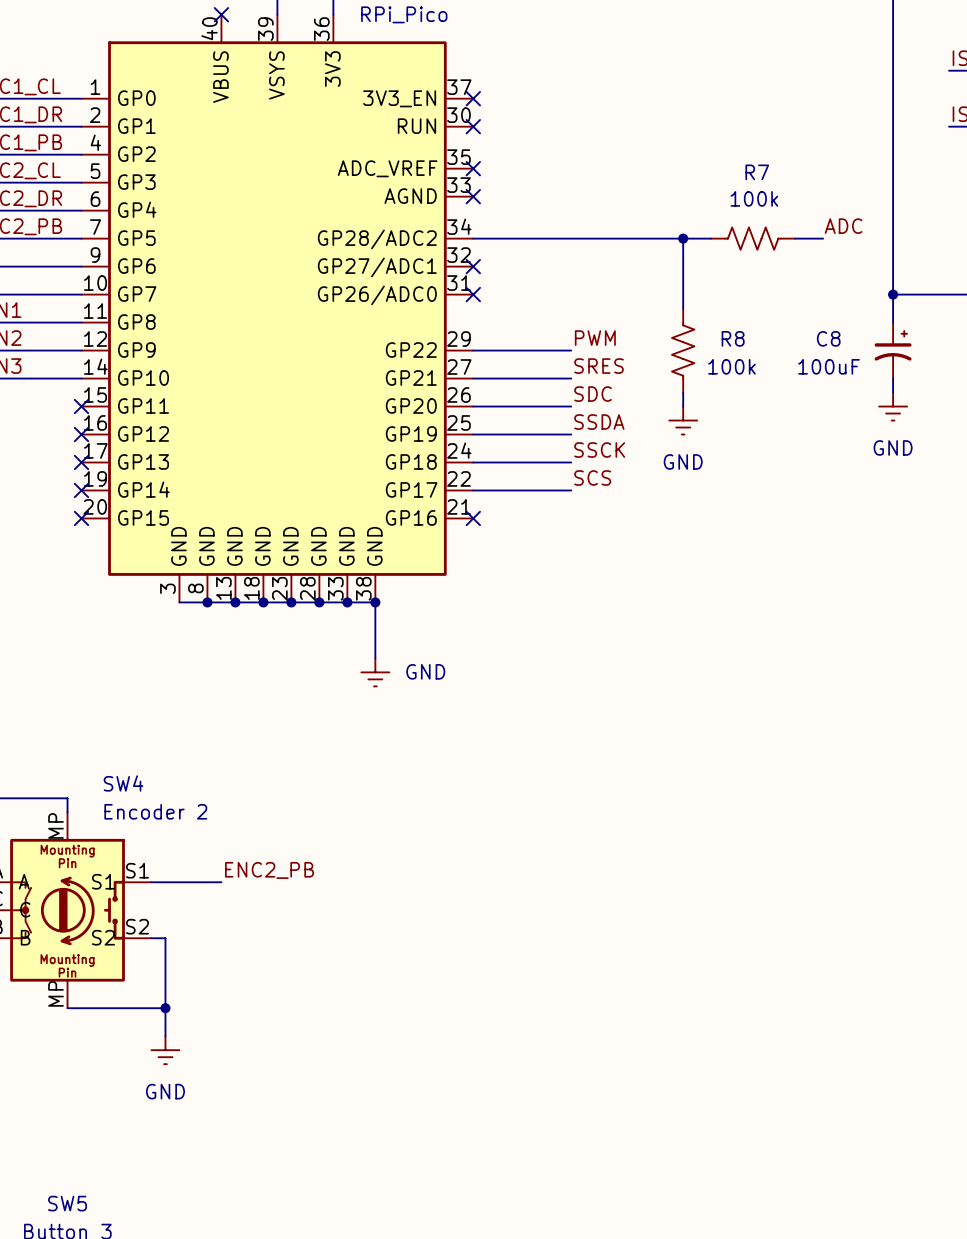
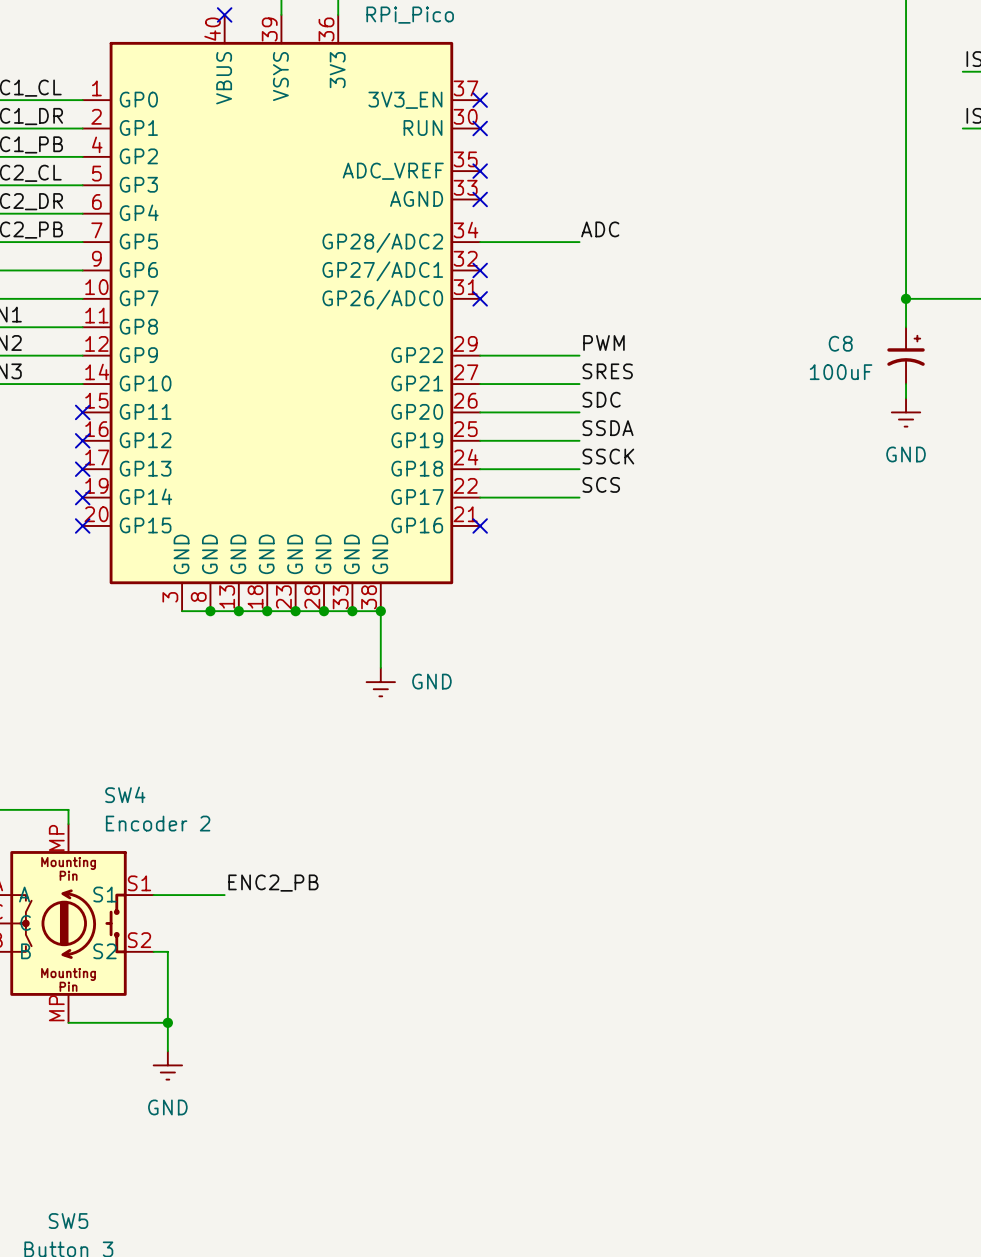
label position: ADC (843, 226) -> ADC (600, 229)
wire: (571, 238) (711, 238) -> none
wire: (683, 238) (683, 308) -> none
junction: (683, 238) -> none
R7: 100k (753, 238) -> none
wire: (795, 238) (823, 238) -> none
R8: 100k (683, 350) -> none
wire: (683, 392) (683, 406) -> none
power symbol: GND (683, 420) -> none

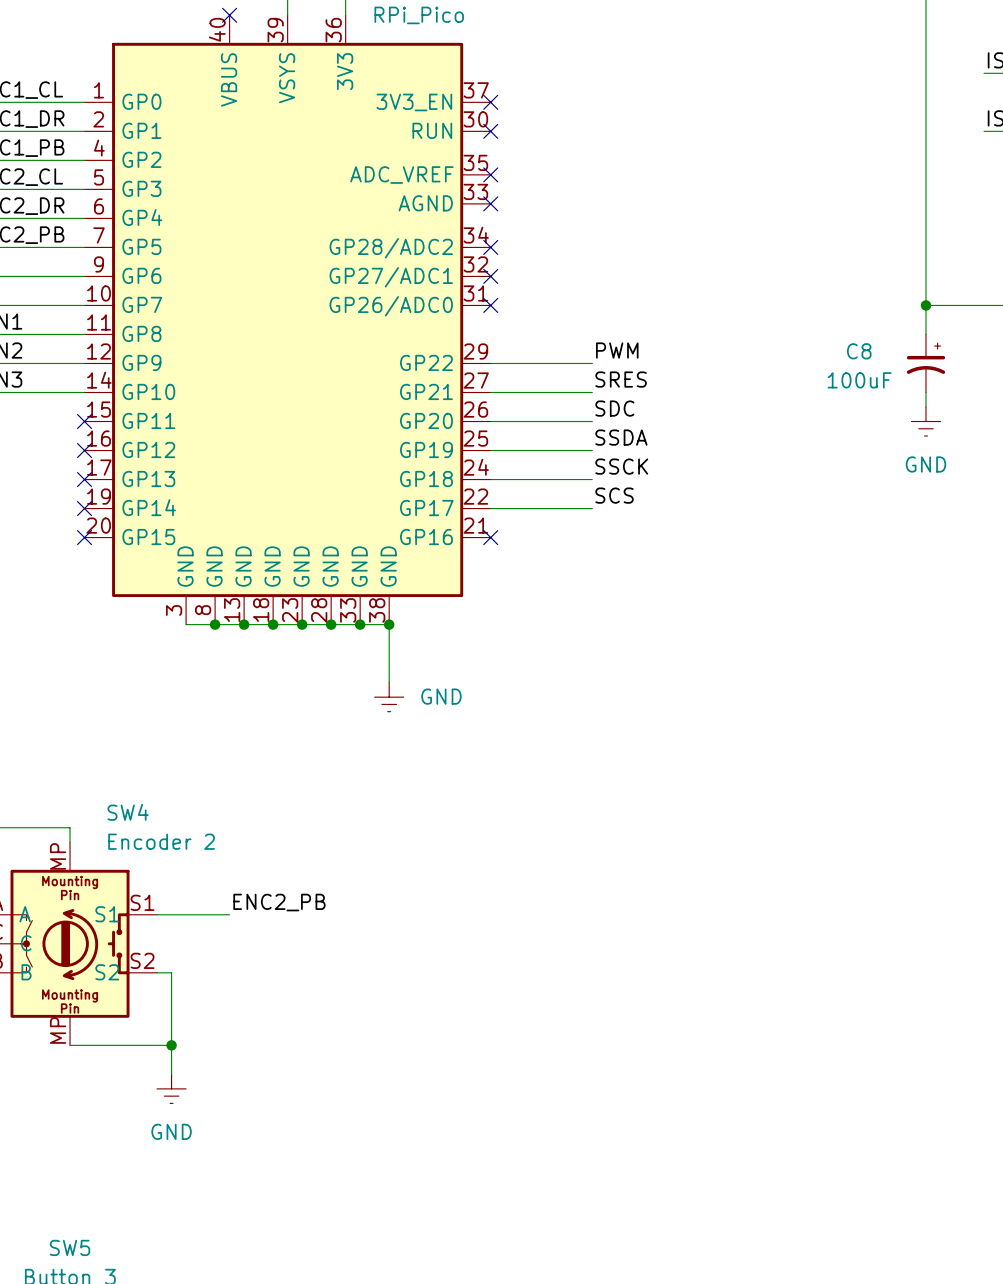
label: ADC (600, 229) -> none
wire: (480, 242) (579, 242) -> none
no-connect mark: none -> (490, 247)

